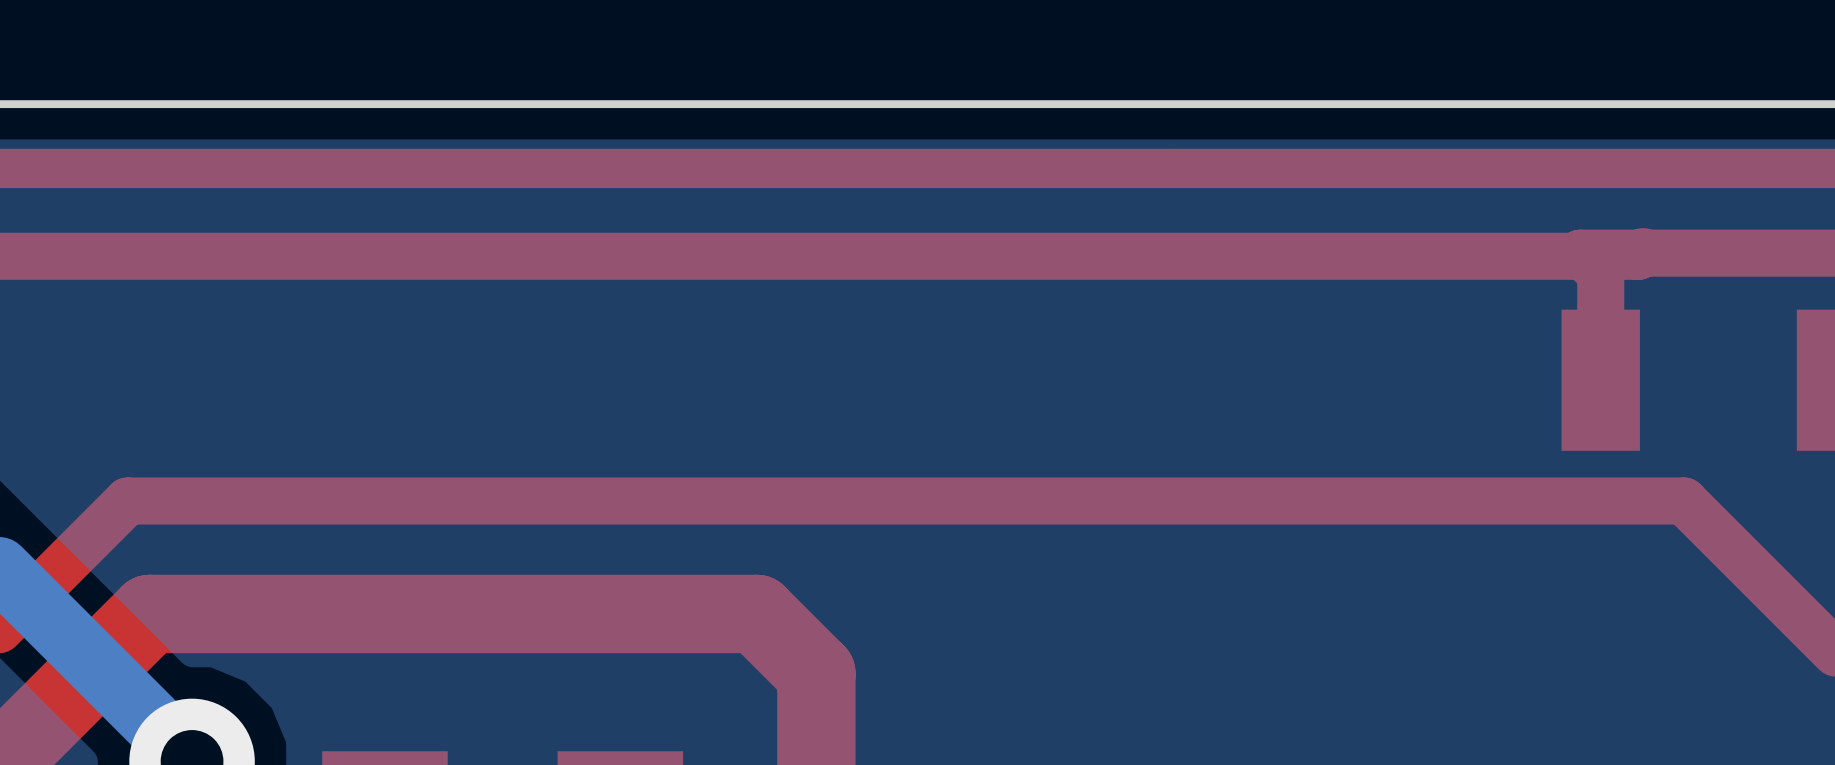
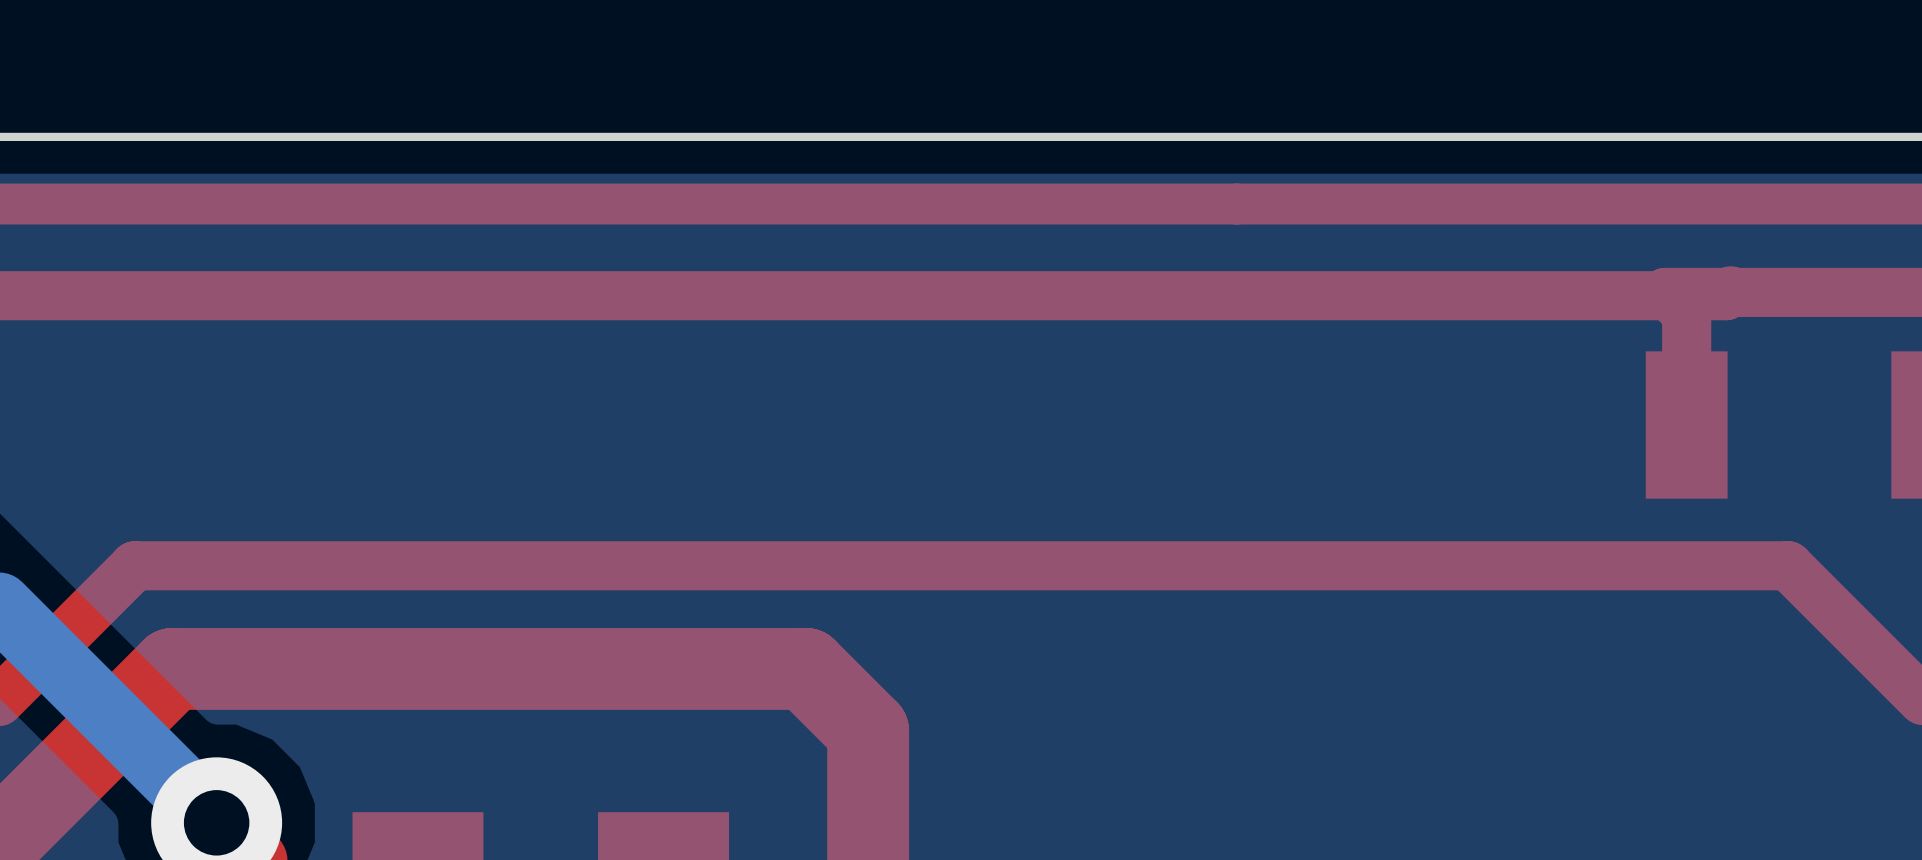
top track: (1698, 515) (1683, 501) (127, 501) (113, 515) -> (1788, 565) (134, 565)

